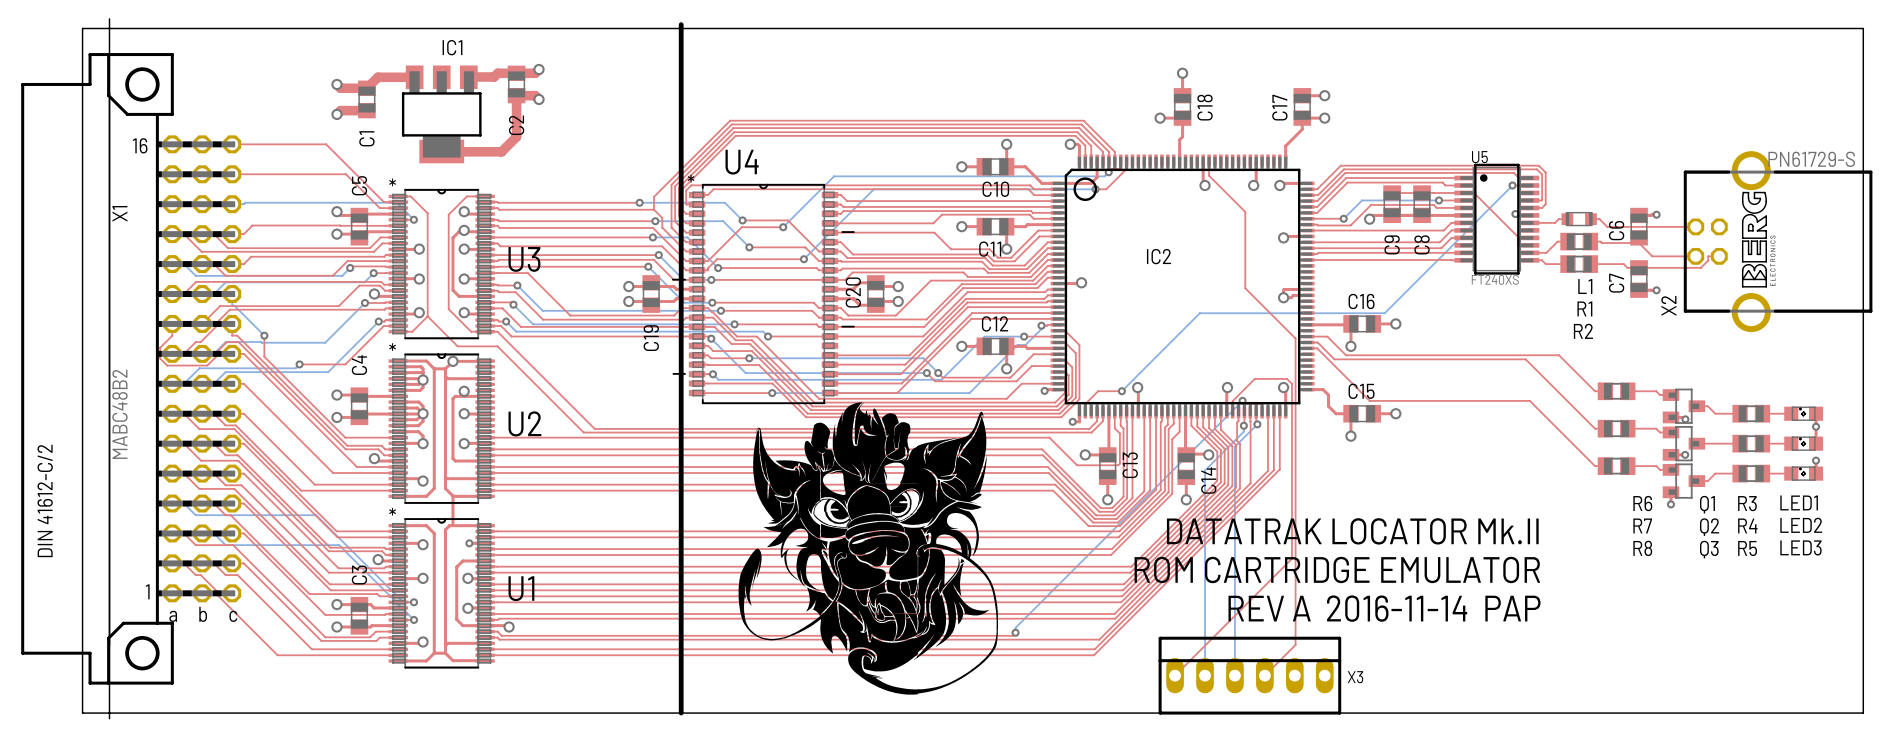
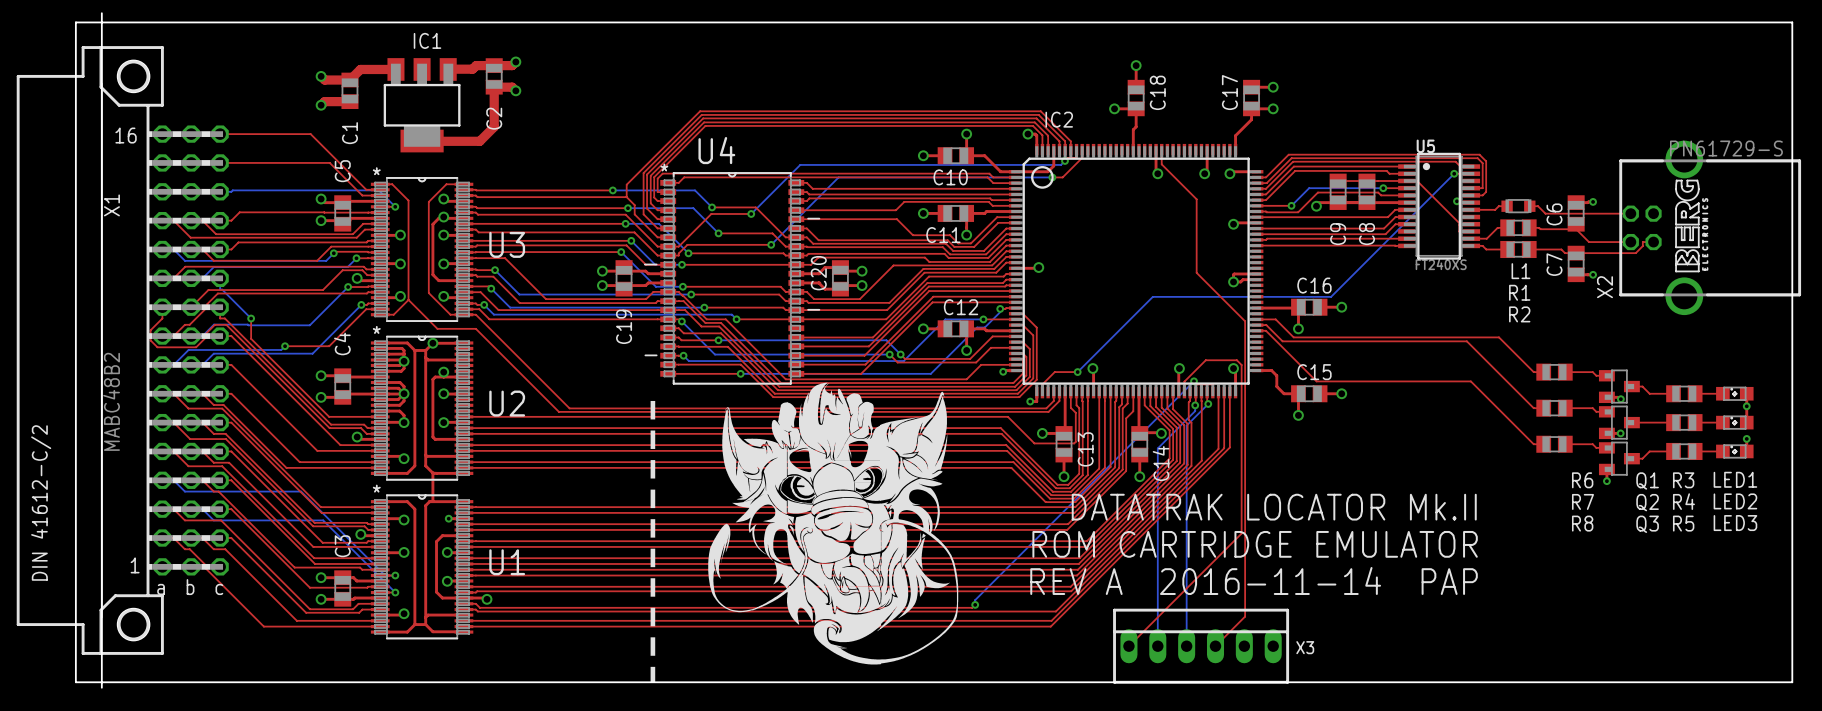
line: (681, 24) (681, 713) -> (652, 400) (652, 682)
IC2 name position: IC2 (1158, 256) -> IC2 (1059, 119)

